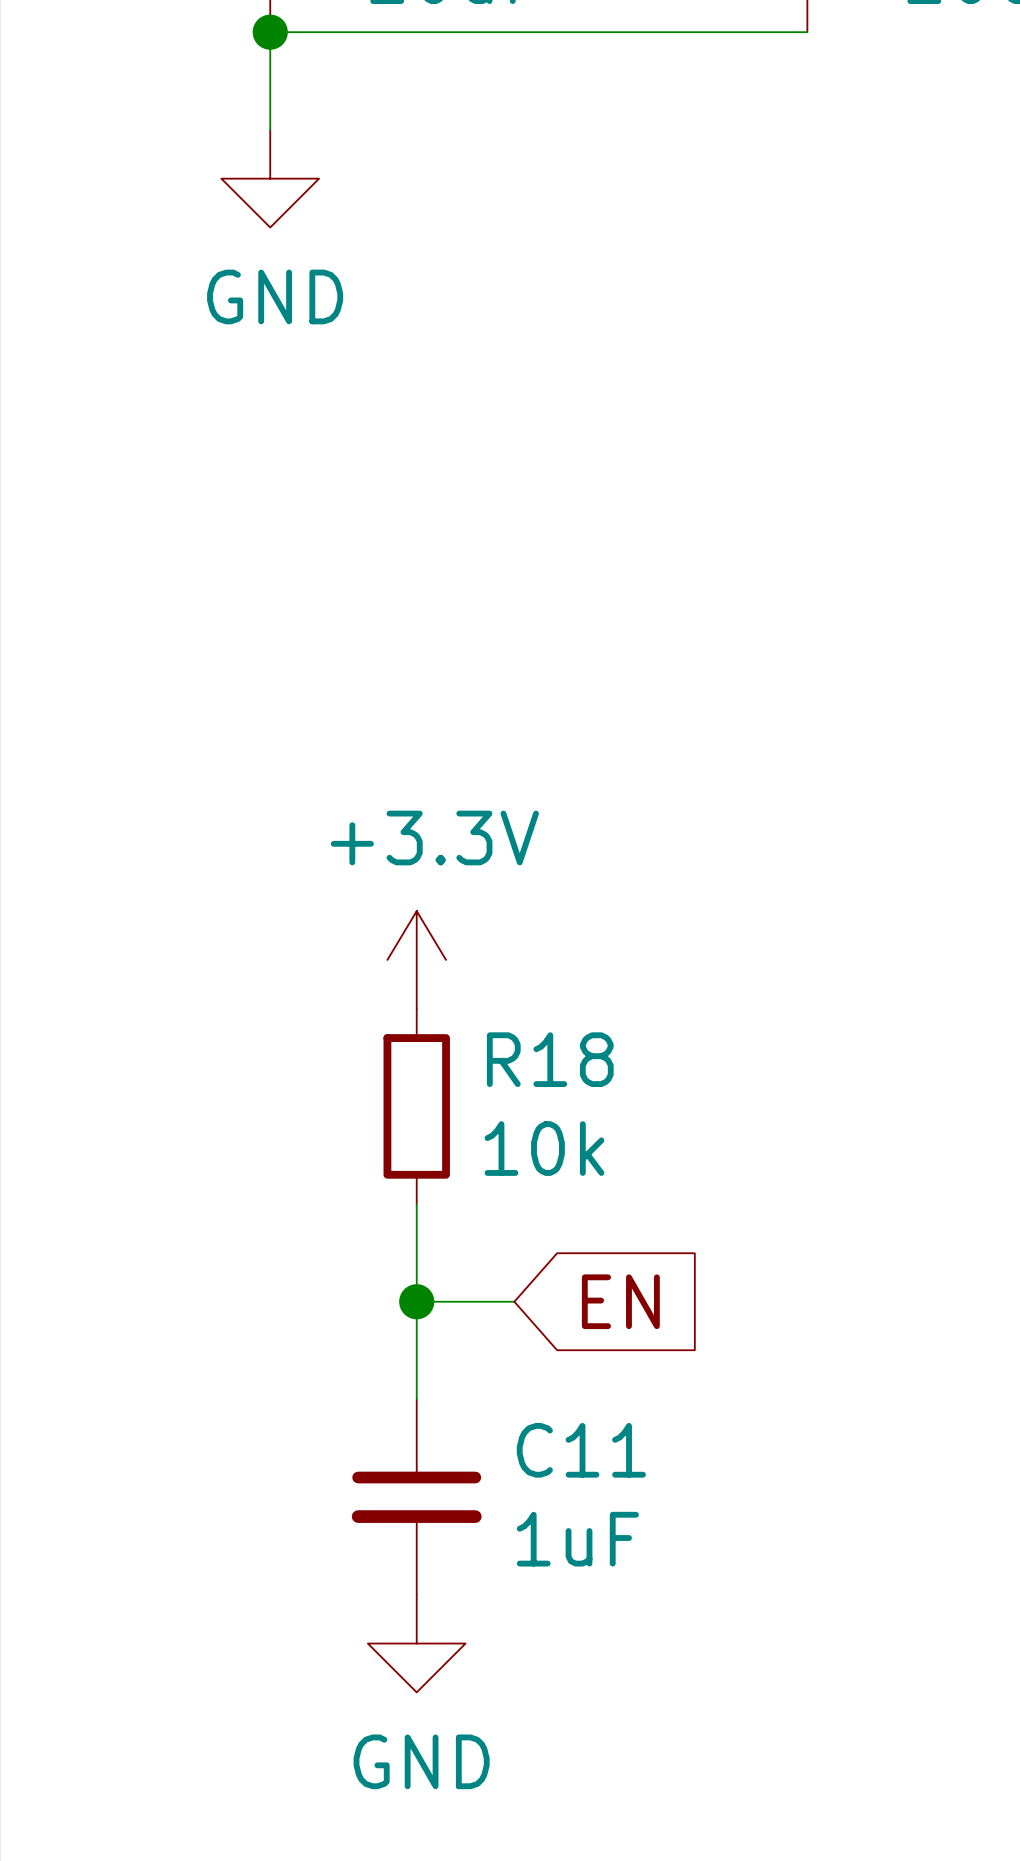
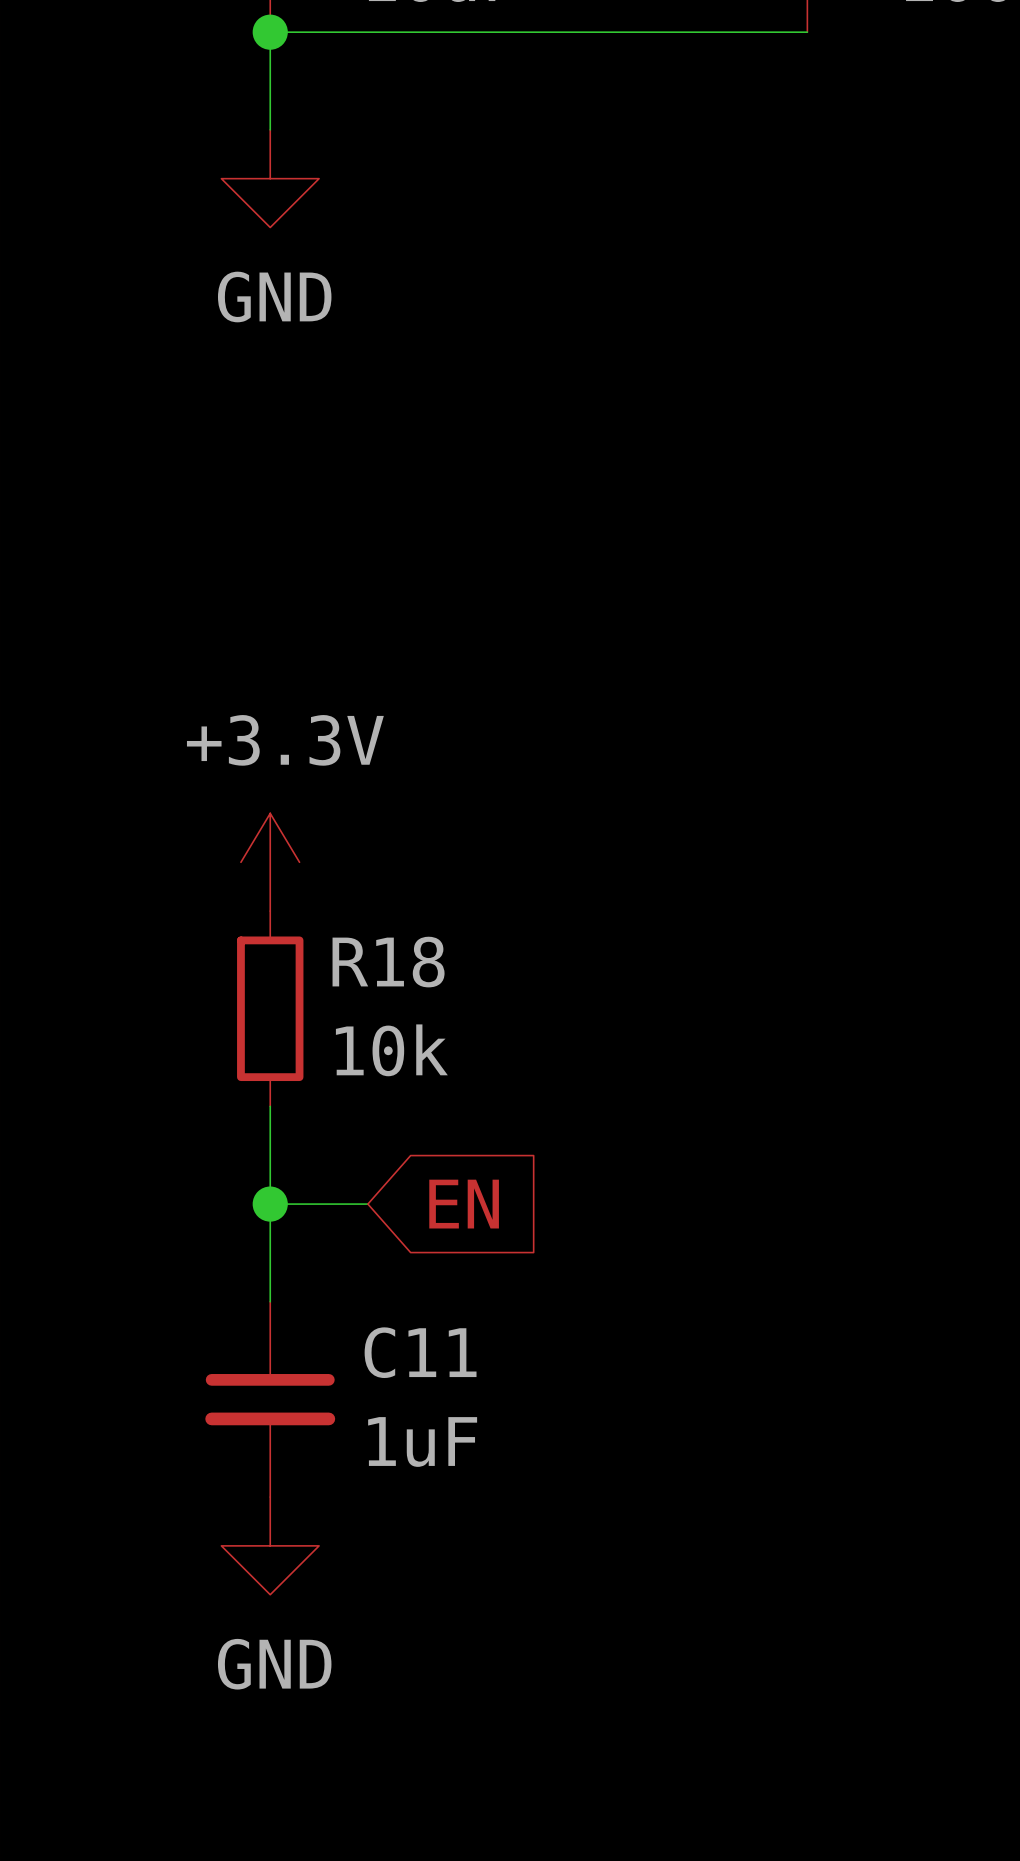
power symbol position: +3.3V (416, 959) -> +3.3V (270, 862)
R18 position: (416, 1106) -> (270, 1008)
wire: (416, 1204) (416, 1399) -> (270, 1106) (270, 1301)
wire: (416, 1301) (514, 1301) -> (270, 1204) (367, 1204)
junction position: (416, 1301) -> (270, 1204)
global label position: EN (620, 1301) -> EN (464, 1204)
C11 position: (416, 1497) -> (270, 1399)
power symbol position: GND (416, 1643) -> GND (270, 1545)

